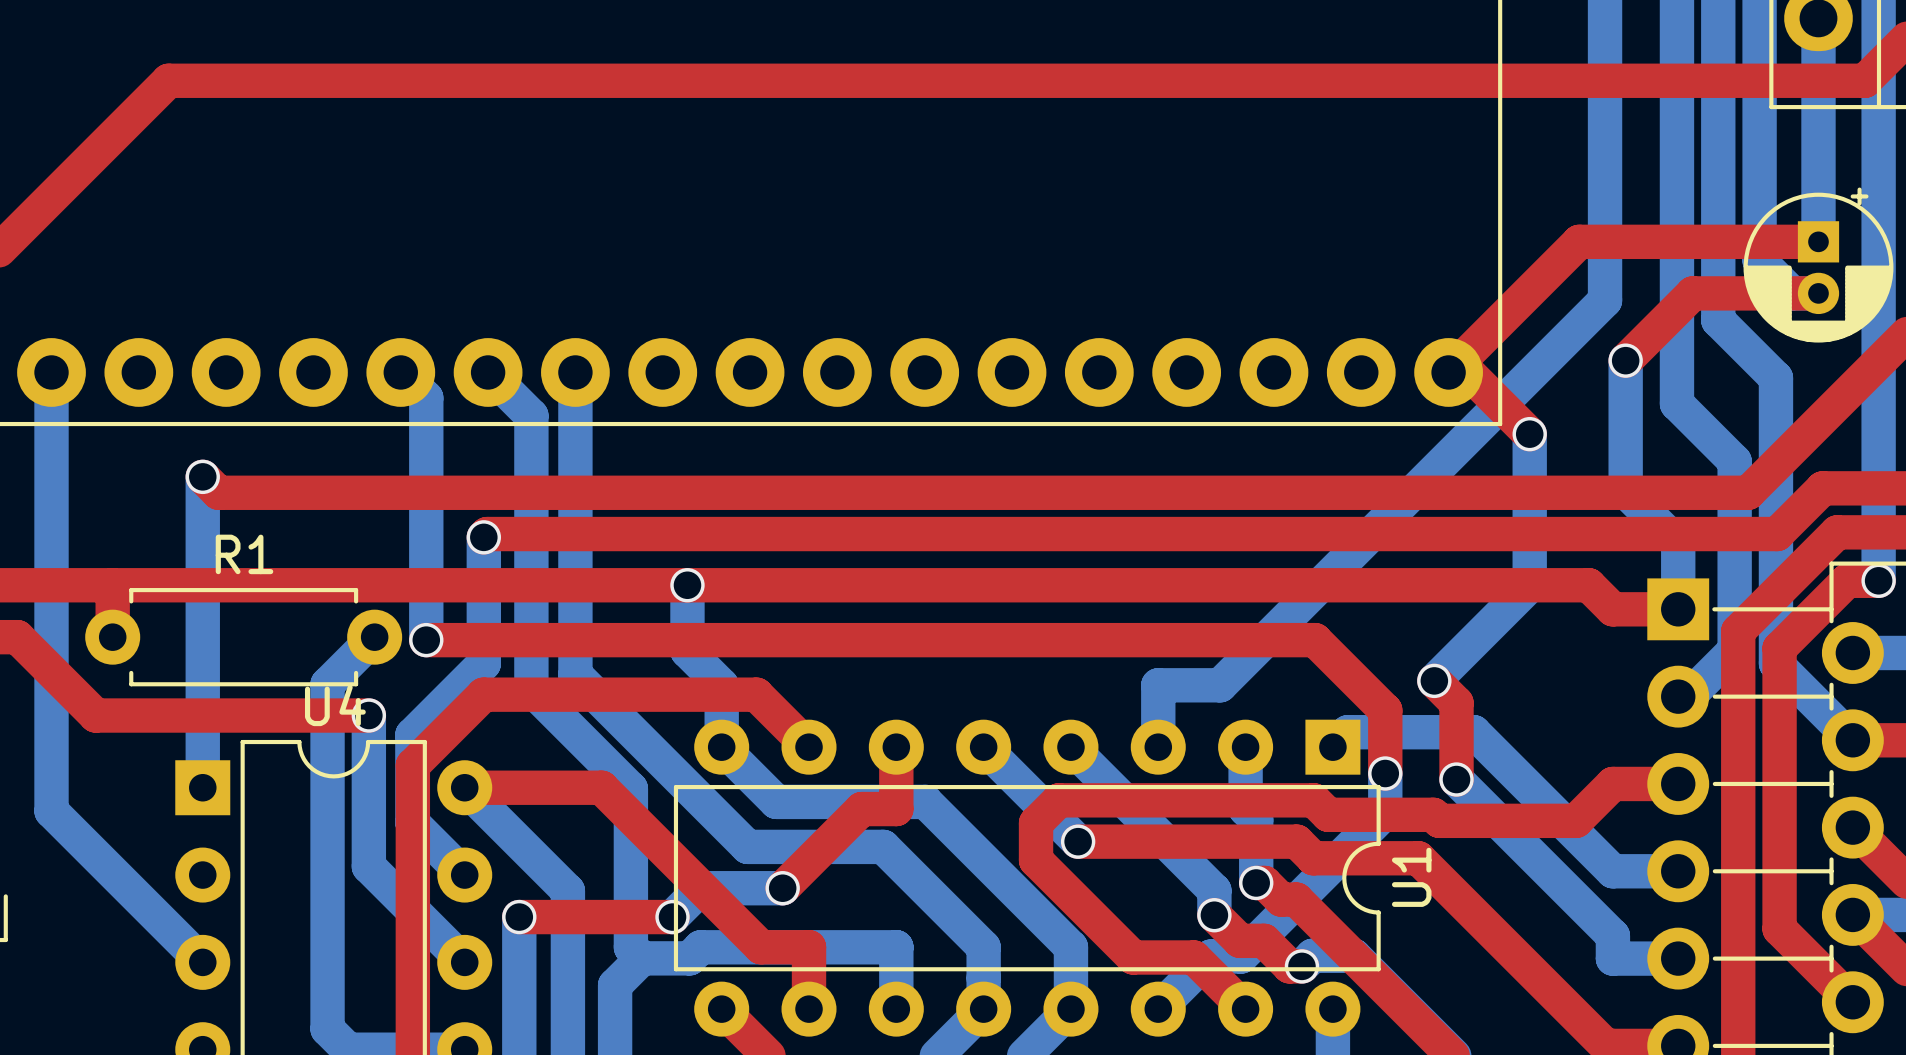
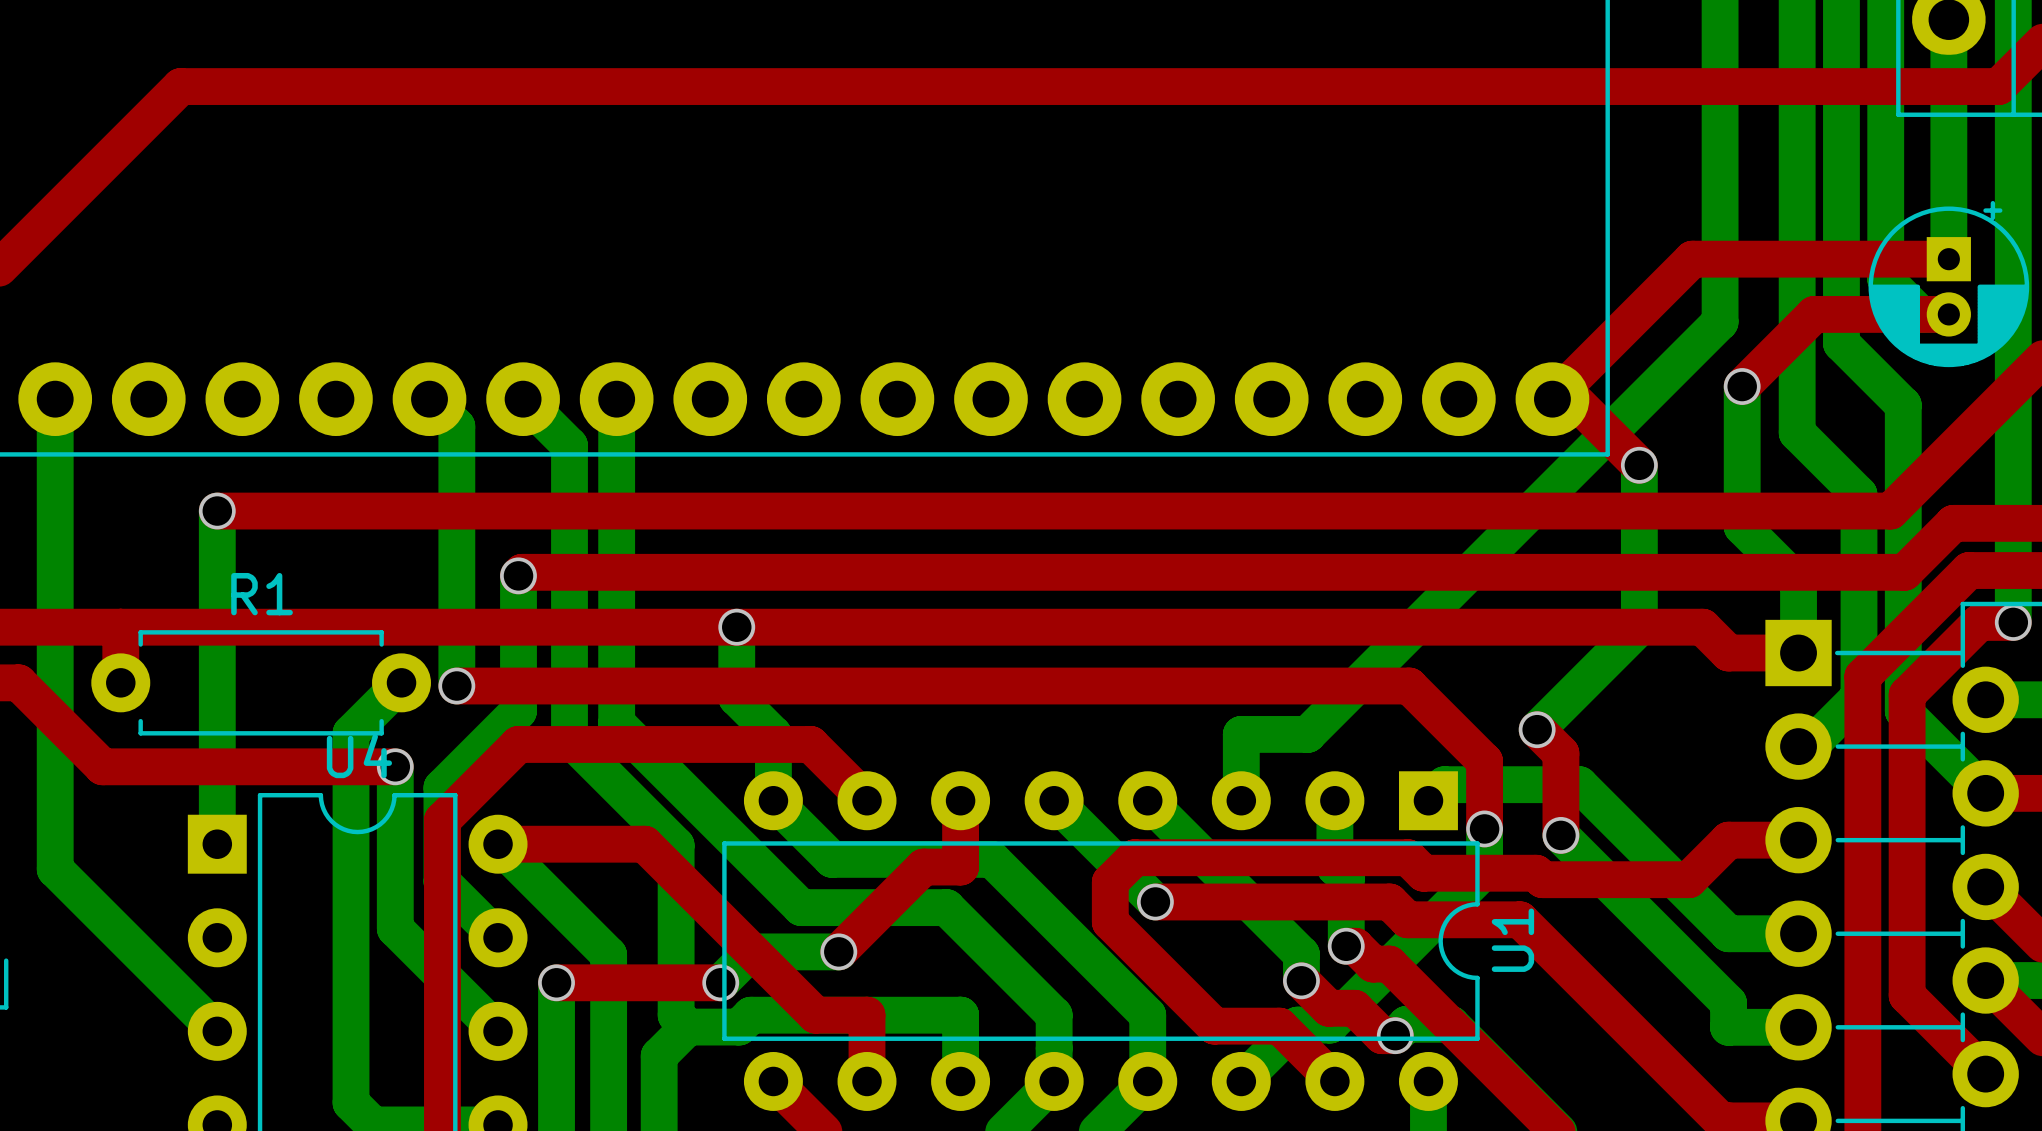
top track: (202, 476) (218, 492) (1748, 492) (1764, 476) -> (217, 511) (1890, 511)

